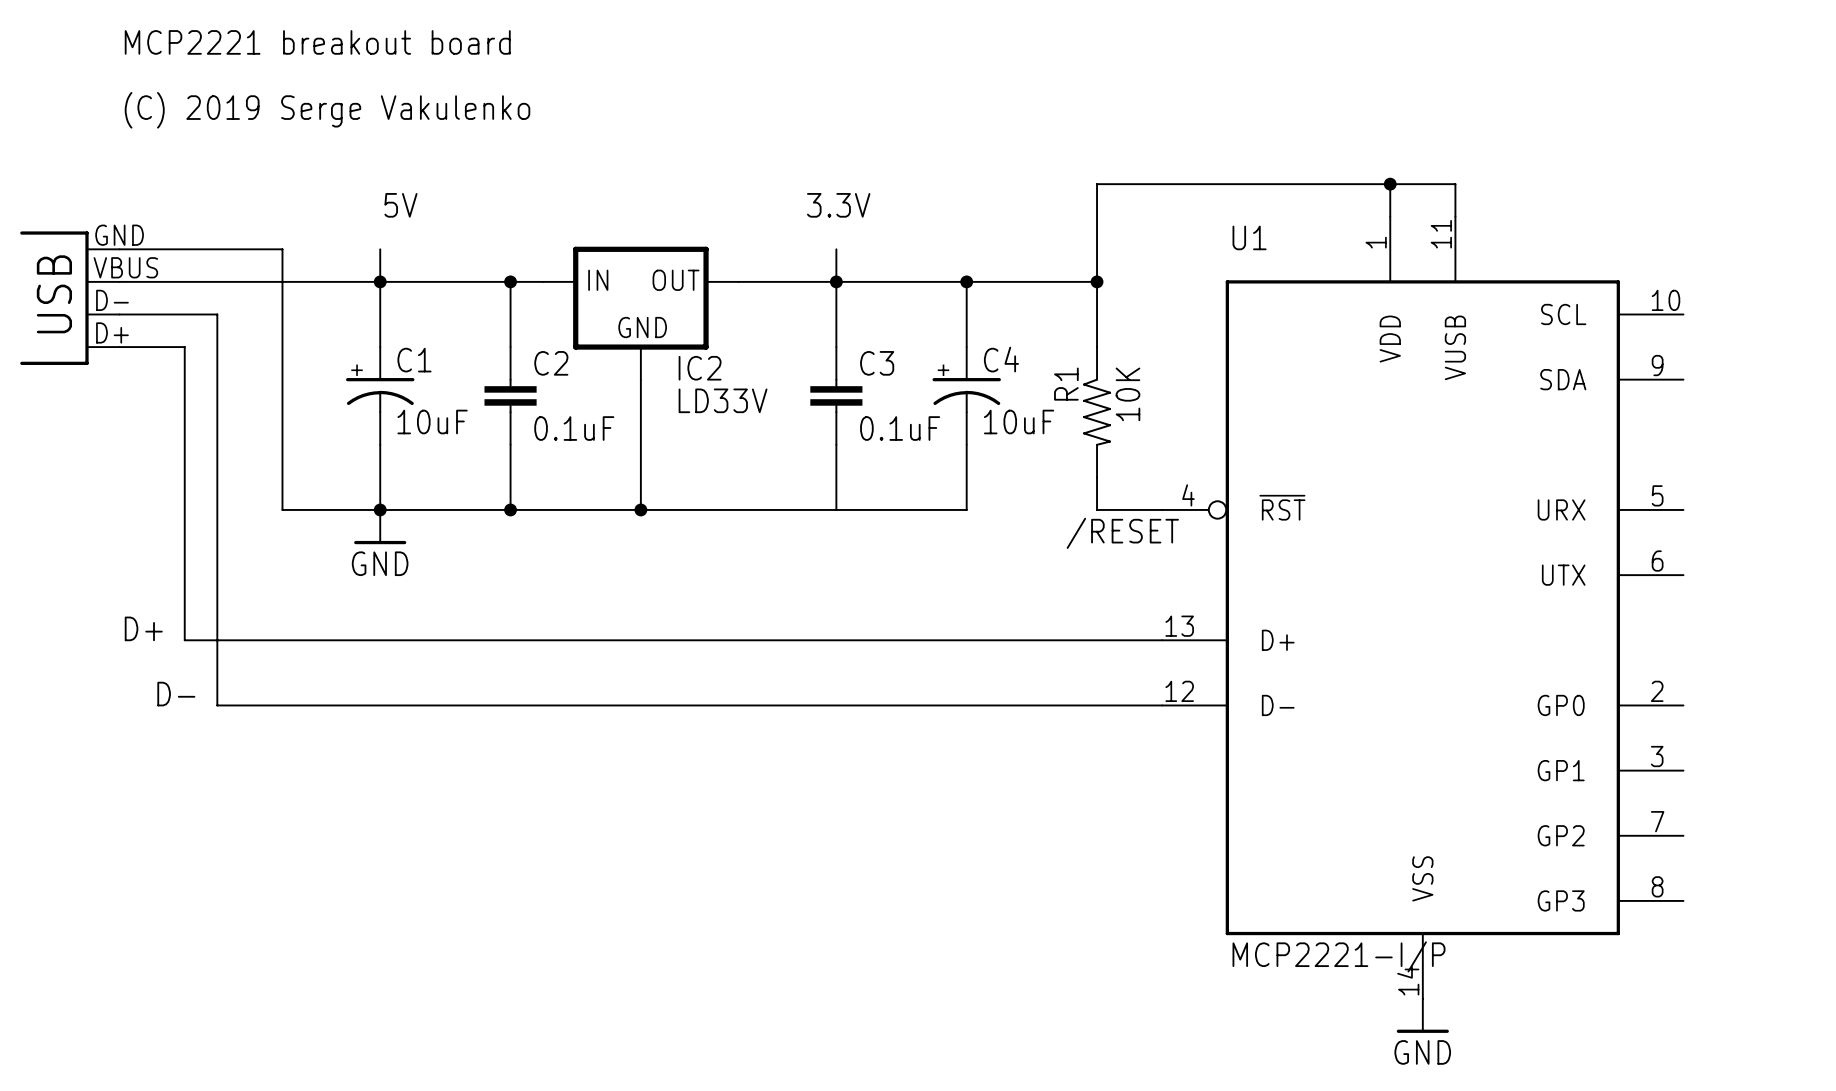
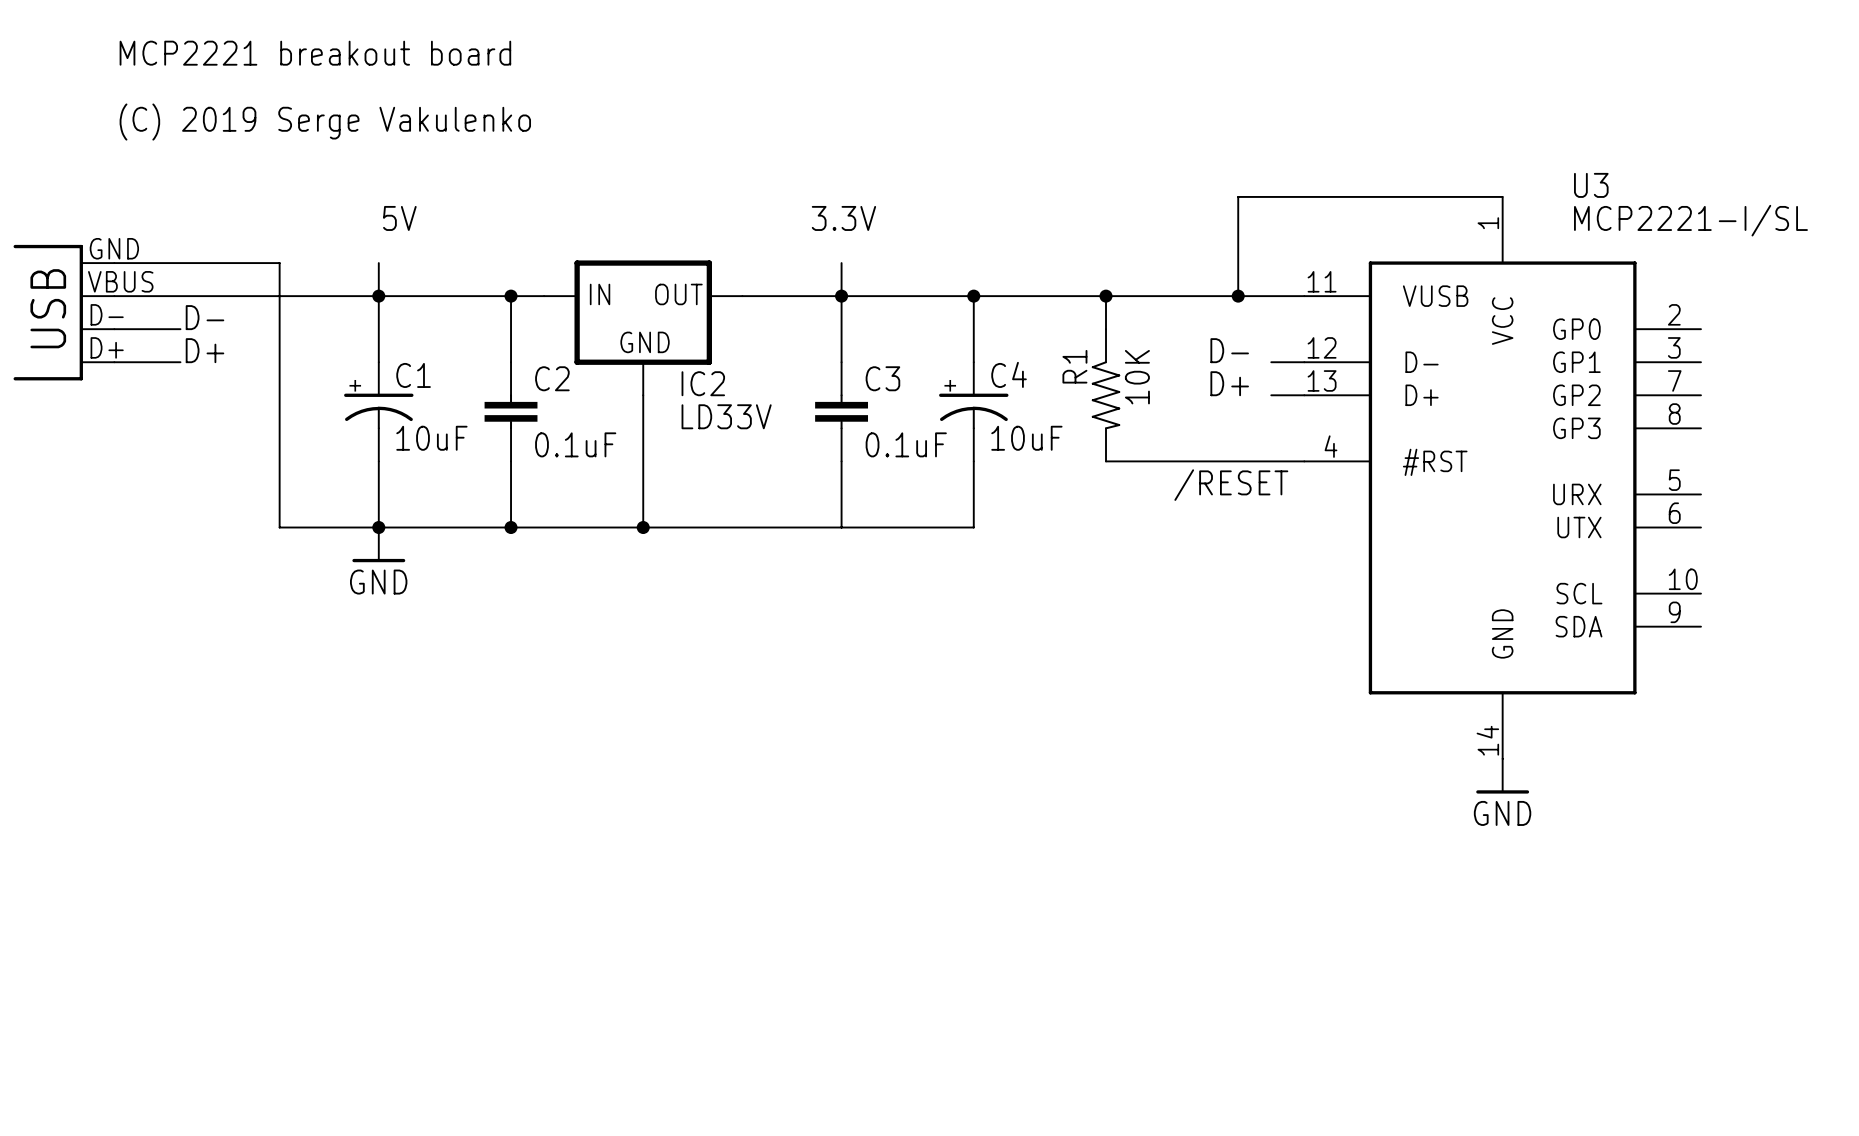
wire: (1227, 184) (1097, 184) (1097, 281) -> (1304, 296) (1106, 296)
wire: none -> (1238, 196) (1238, 296)
wire: (1390, 184) (1390, 216) -> none
junction: (1390, 184) -> none
wire: (1455, 184) (1455, 216) -> (1469, 196) (1502, 196)
junction: none -> (1238, 296)
label: none -> D- (205, 317)
wire: (184, 314) (217, 314) (217, 705) (1162, 705) -> none
label: none -> D- (1229, 350)
wire: (184, 347) (184, 640) (1162, 640) -> none
wire: none -> (1271, 362) (1304, 362)
label: none -> D+ (1229, 383)
wire: none -> (1271, 395) (1304, 395)
R1 position: (1097, 412) -> (1106, 395)
wire: none -> (1106, 461) (1304, 461)
U3: none -> MCP2221-I/SL (1502, 477)
wire: (1097, 477) (1097, 509) (1162, 509) -> none
label position: /RESET (1122, 533) -> /RESET (1231, 485)
U1: MCP2221-I/P (1422, 607) -> none
label position: D+ (143, 628) -> D+ (205, 350)
label: D- (176, 694) -> none
power symbol position: GND (1422, 1015) -> GND (1502, 776)

